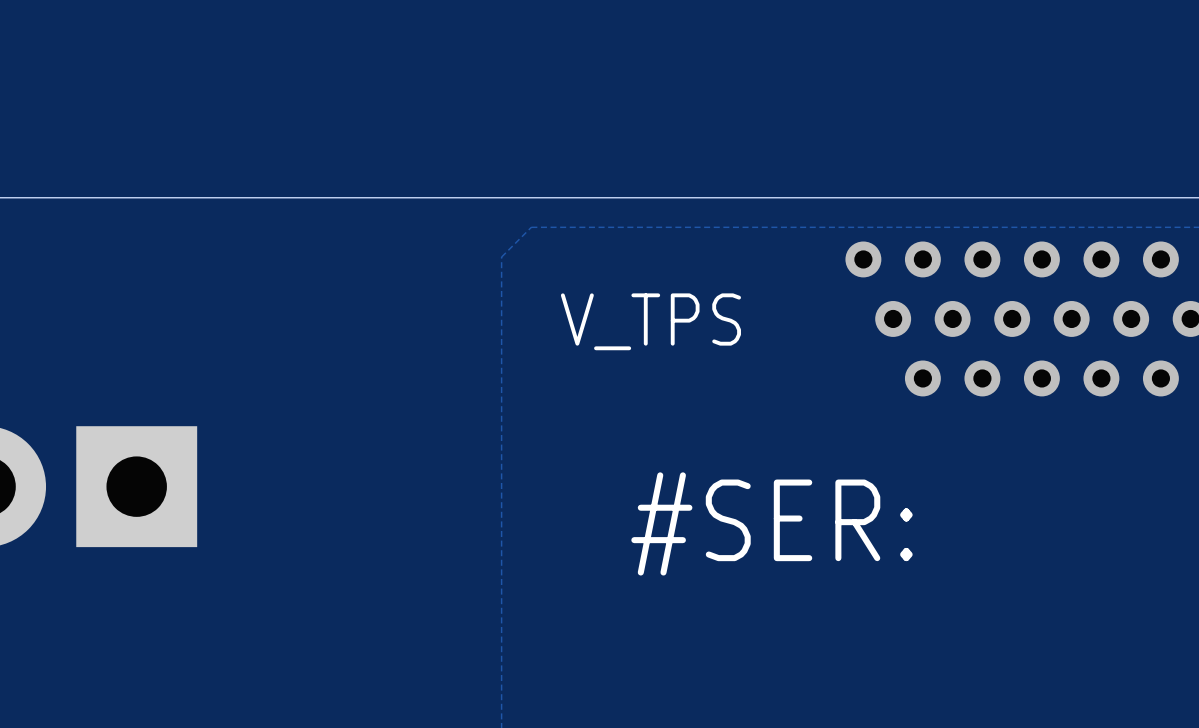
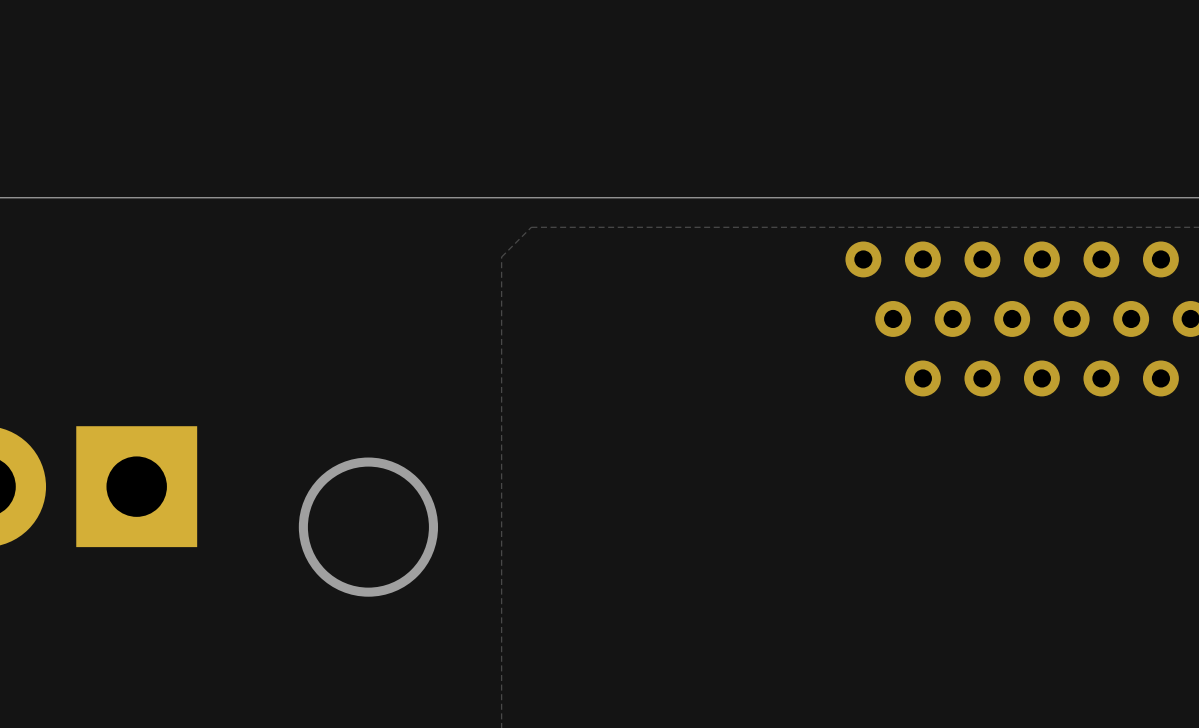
text: V_TPS (650, 321) -> none
round board edge: none -> [298, 457, 439, 597]
text: #SER: (771, 523) -> none

